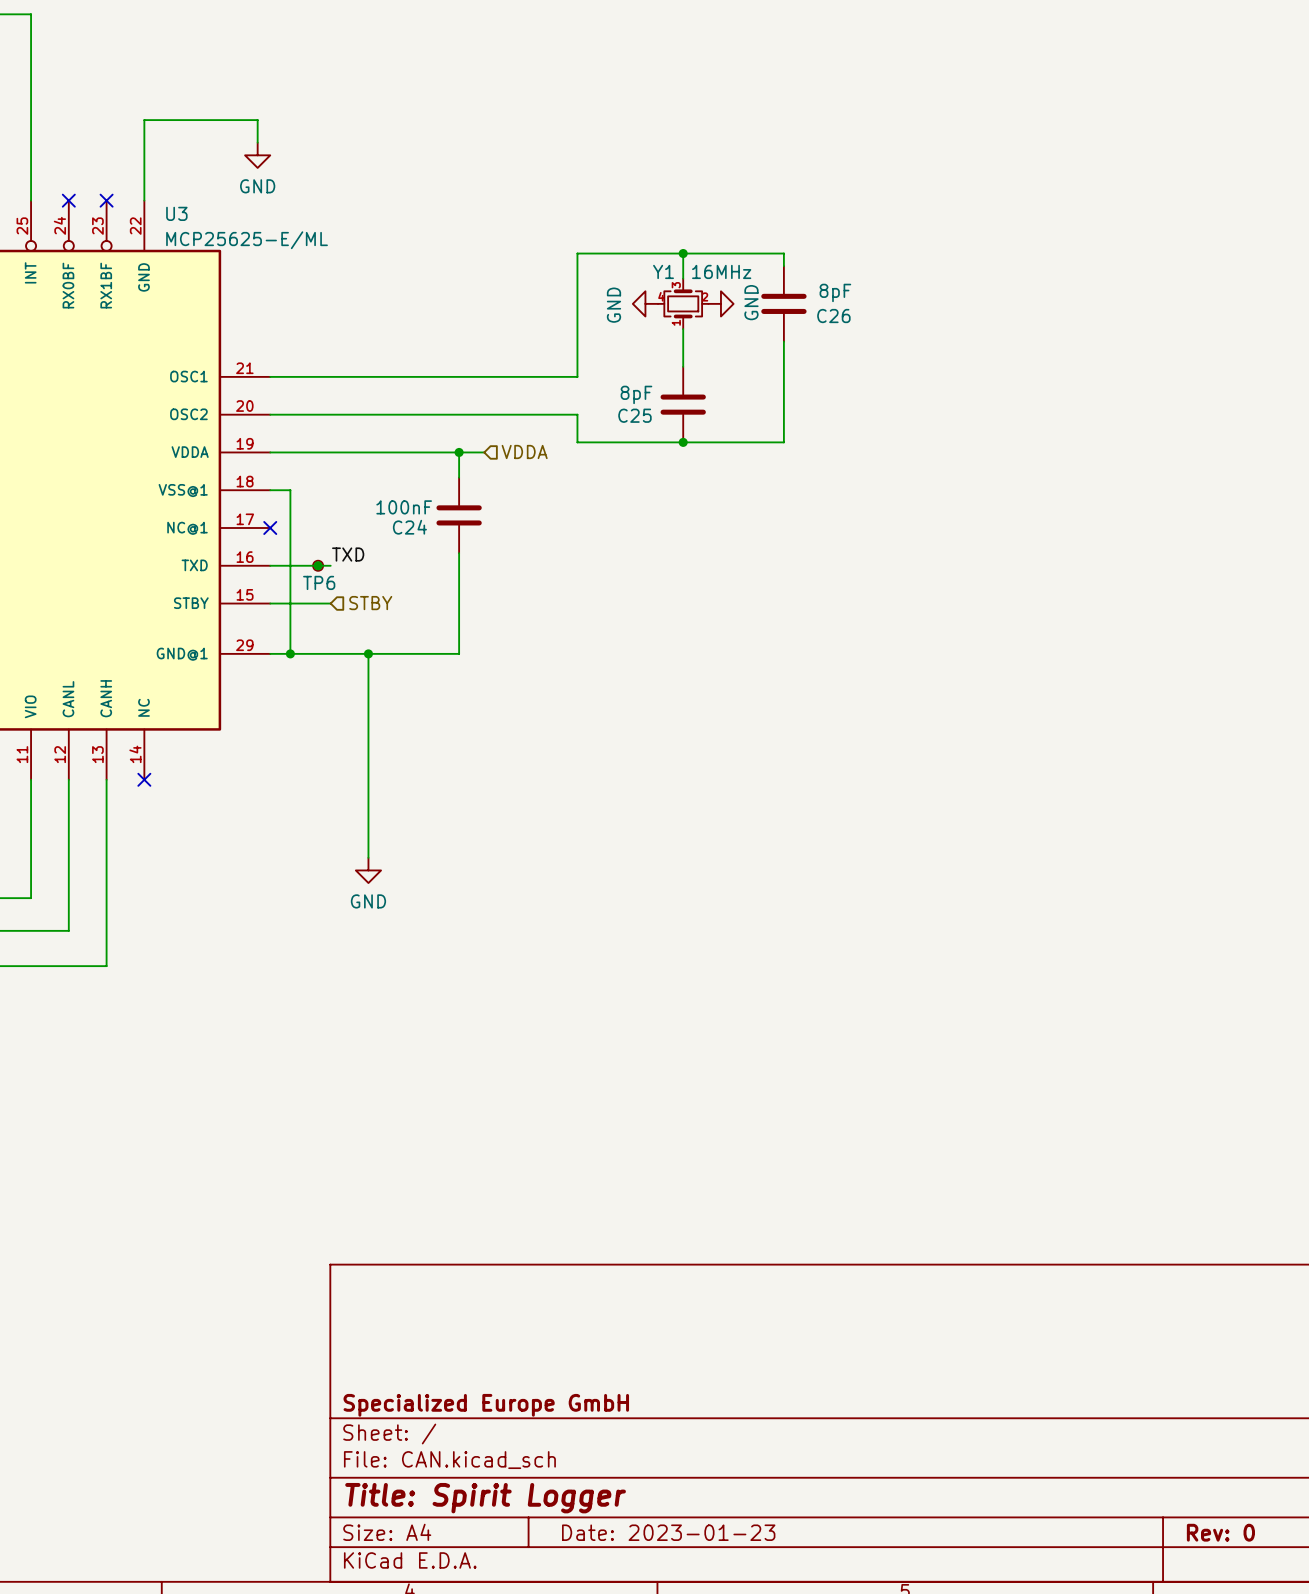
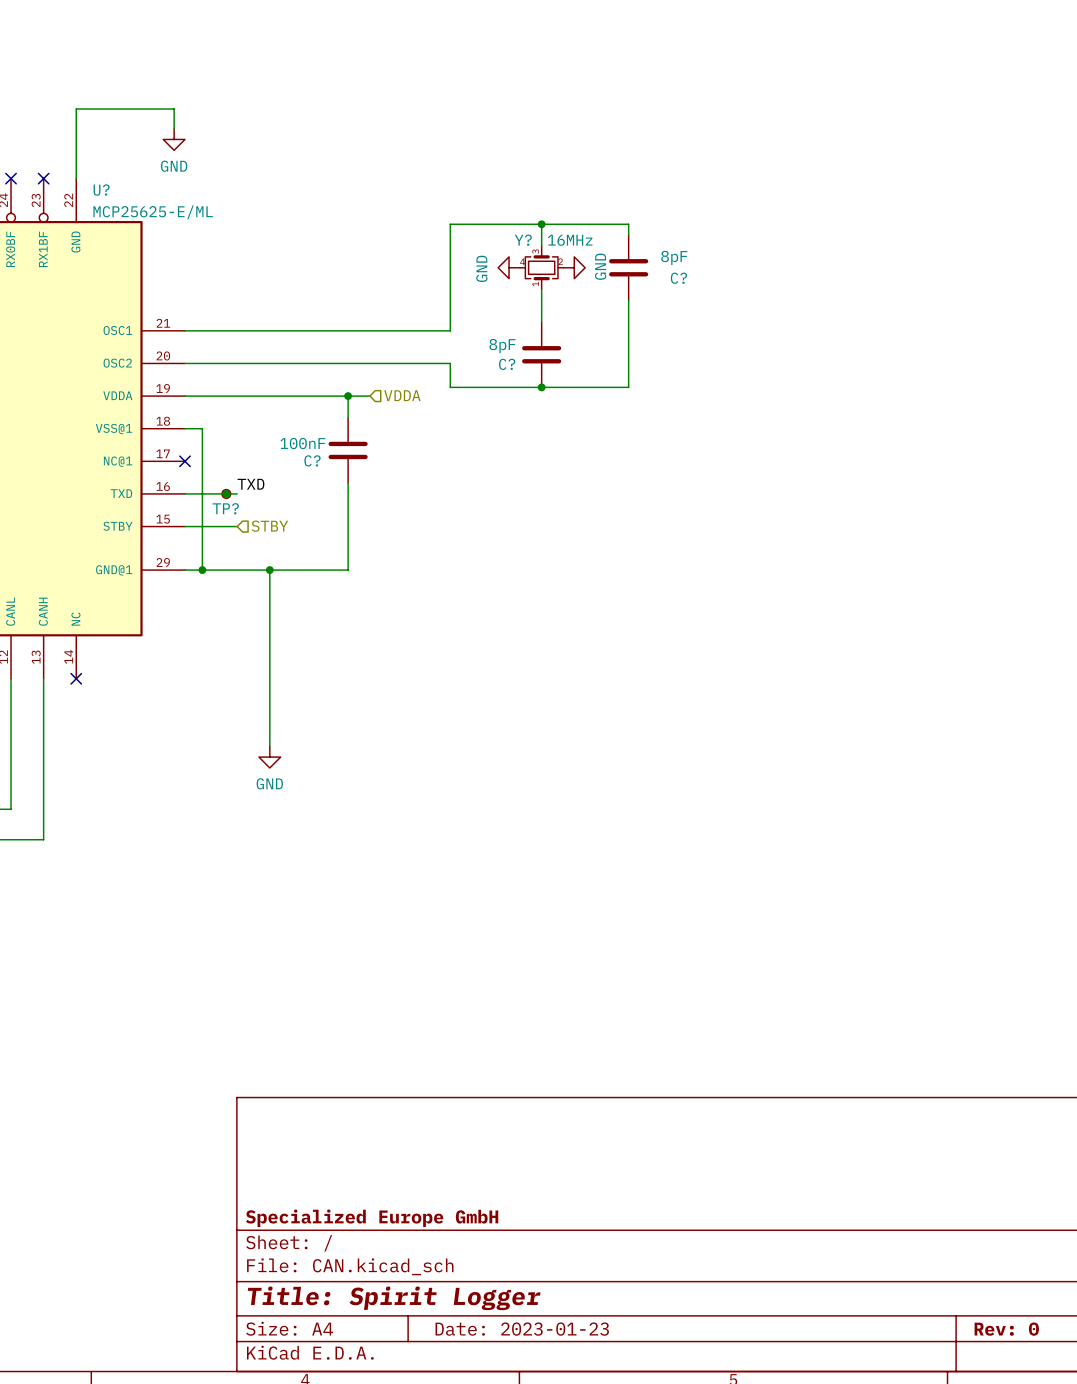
U3 name: U3 (176, 213) -> U? (101, 190)
Y1 name: Y1 (663, 271) -> Y? (523, 240)
C26 name: C26 (833, 316) -> C? (678, 278)
C25 name: C25 (634, 415) -> C? (507, 364)
C24 name: C24 (409, 527) -> C? (312, 460)
TP6 name: TP6 (319, 582) -> TP? (225, 508)

